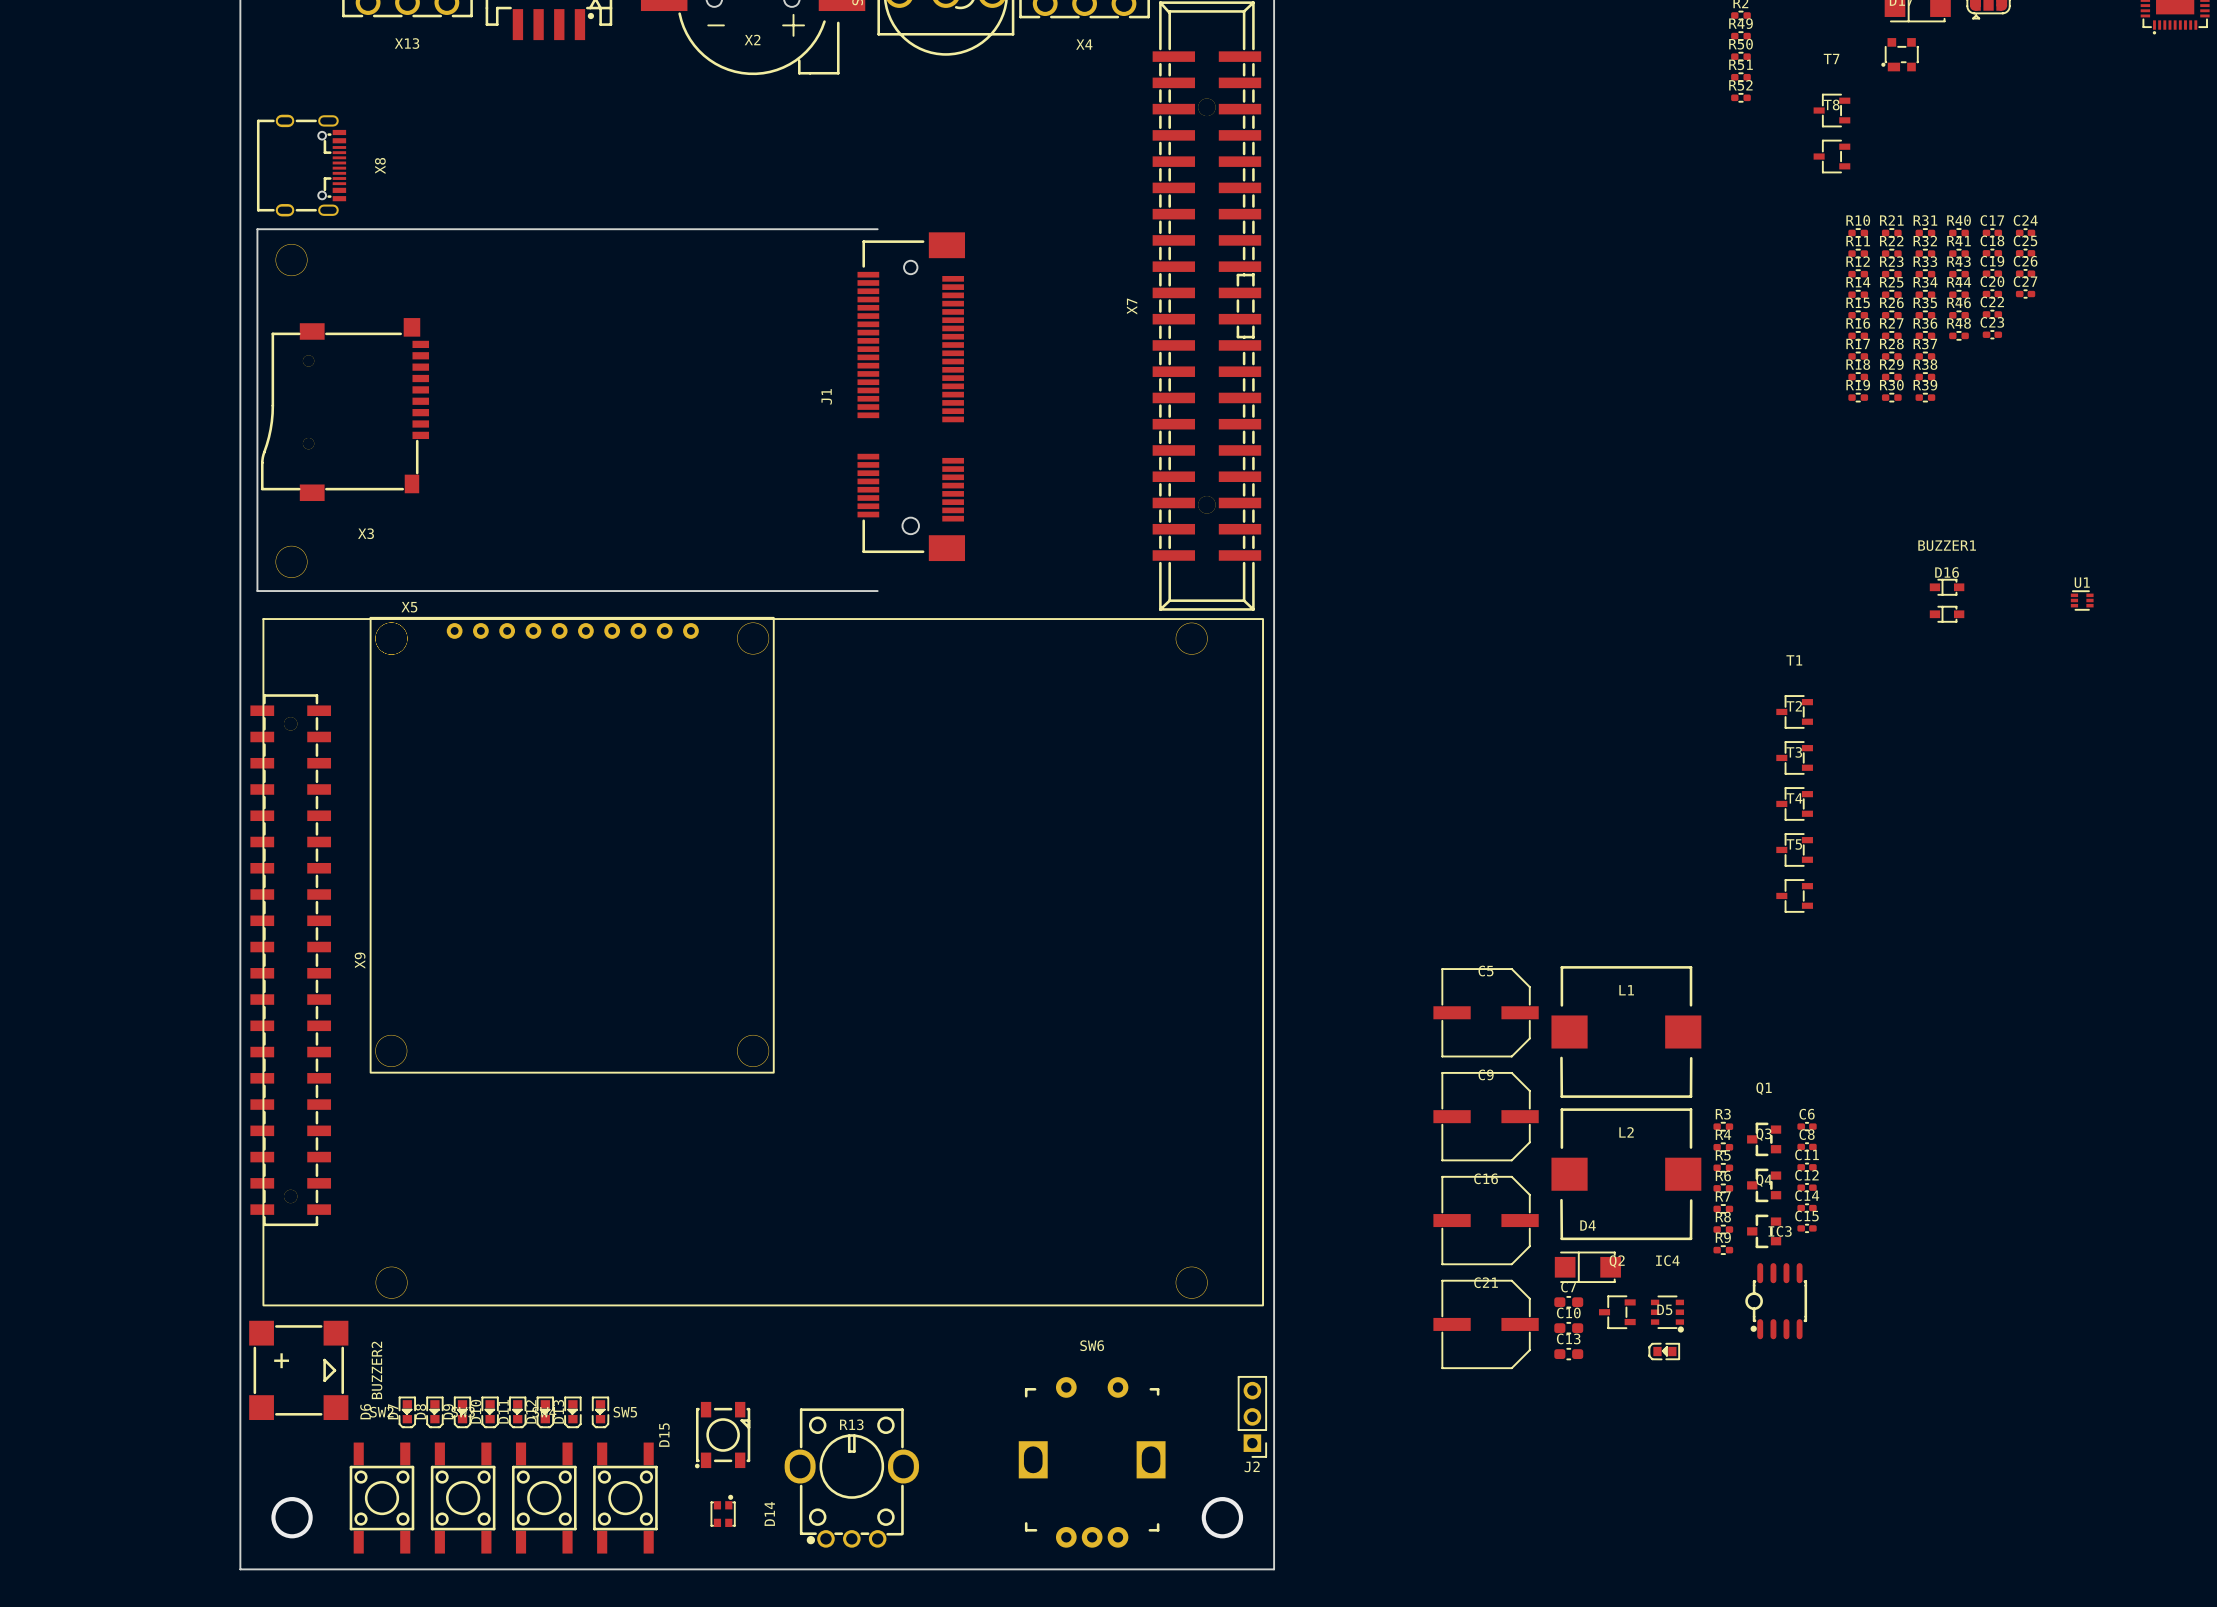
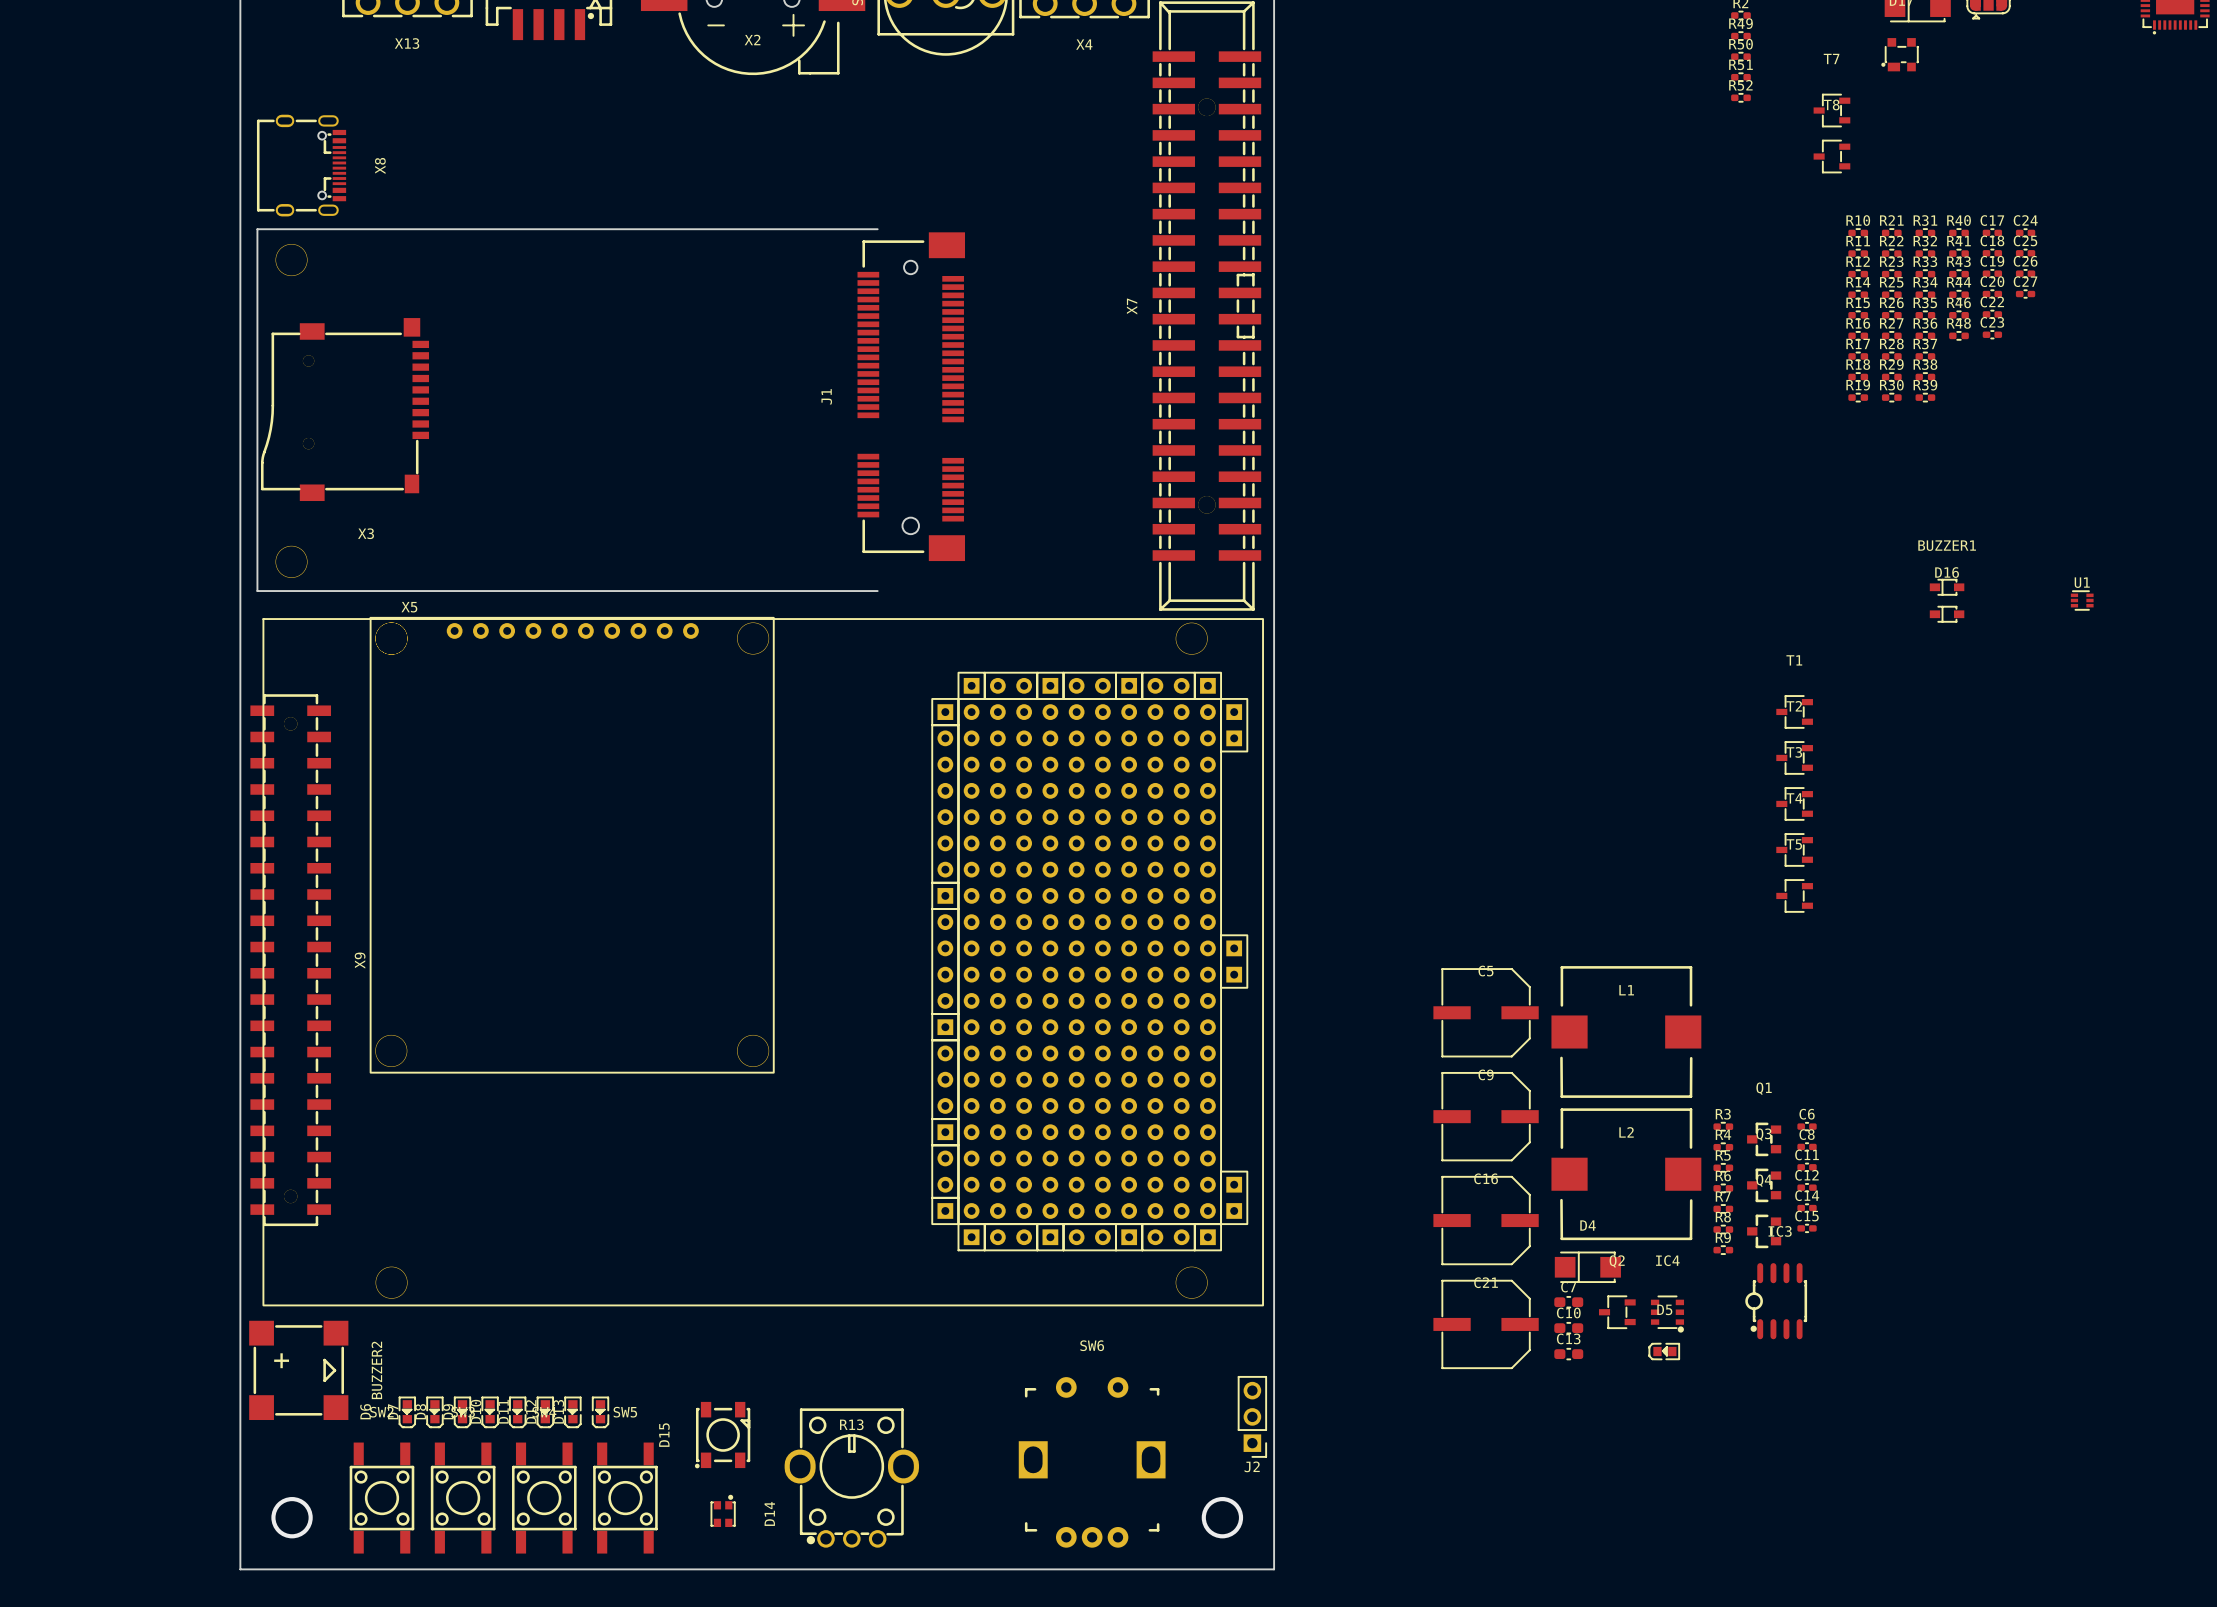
part: none -> (1089, 961)

